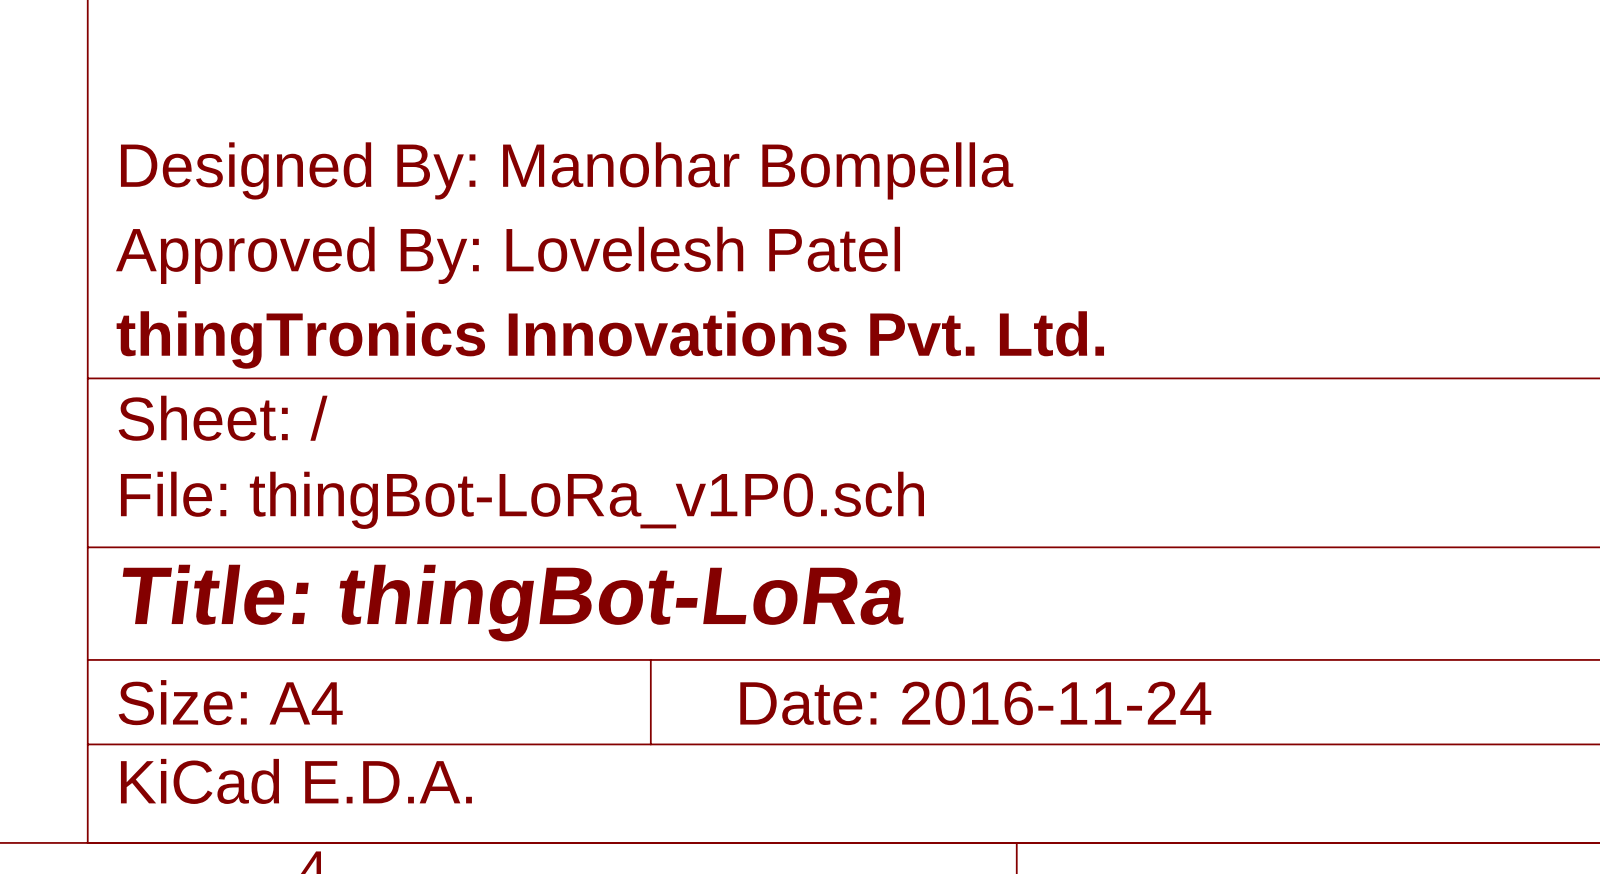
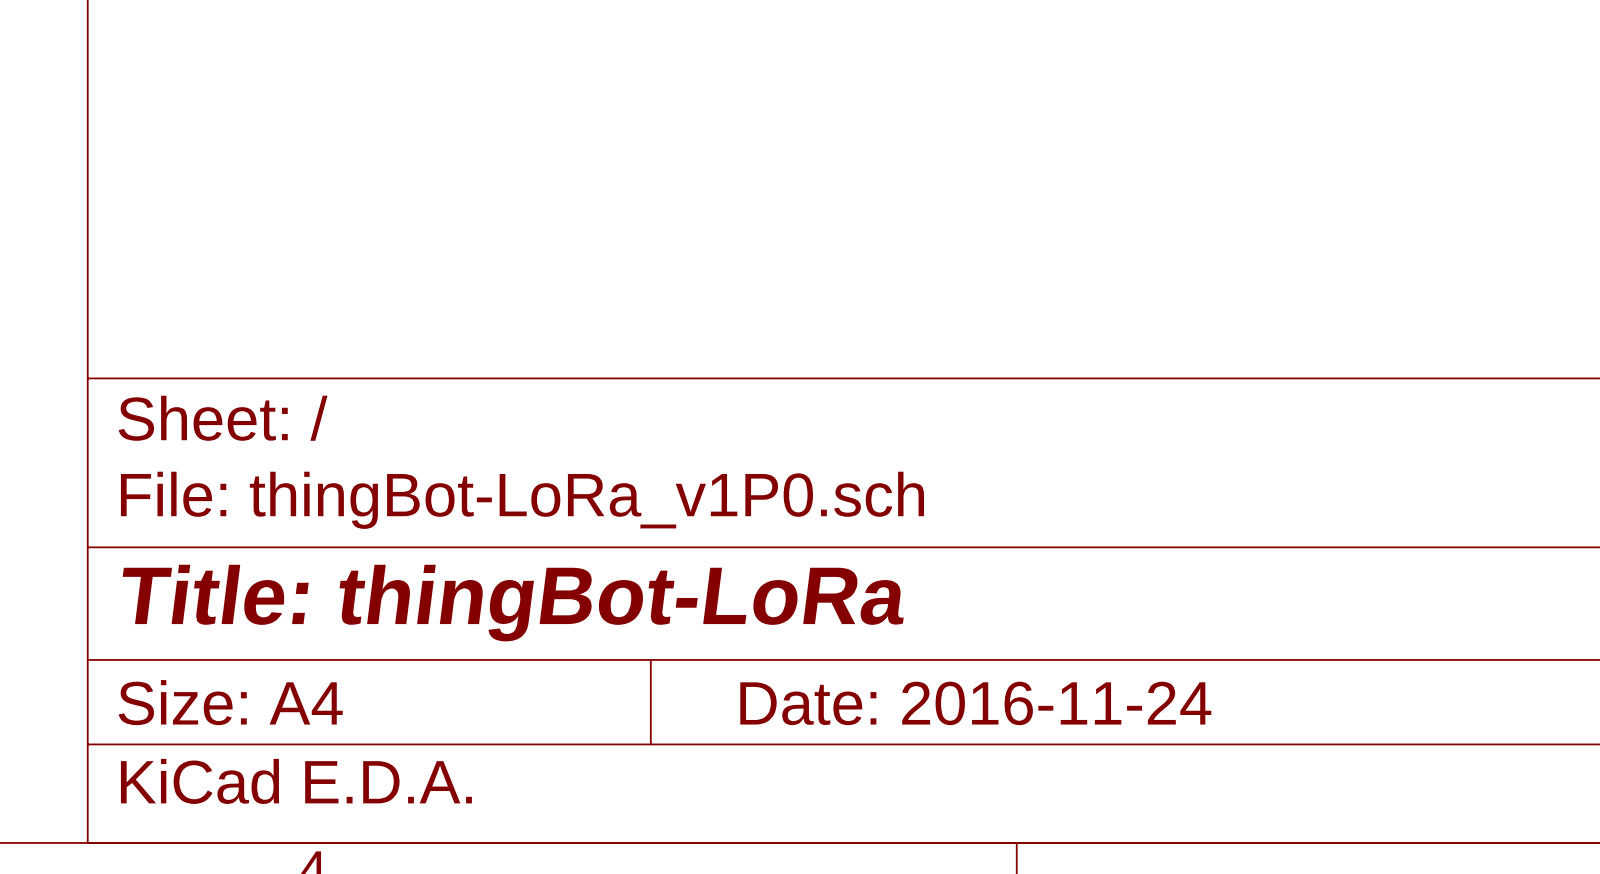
title block: Designed By: Manohar Bompella (567, 170) -> none
title block: Approved By: Lovelesh Patel (508, 255) -> none
title block: thingTronics Innovations Pvt. Ltd. (610, 339) -> none

